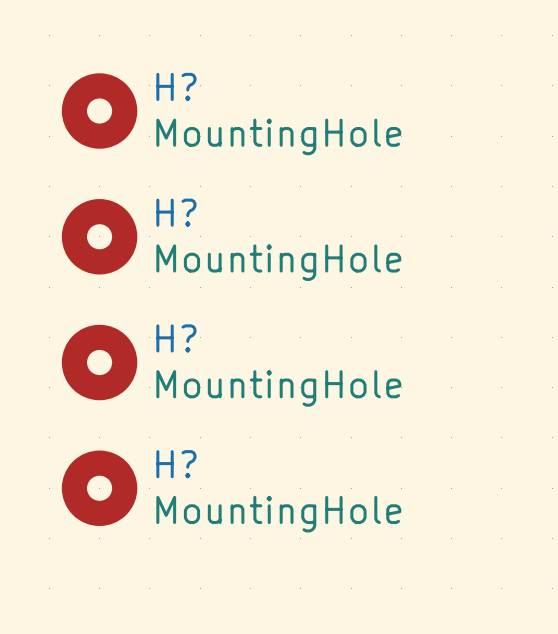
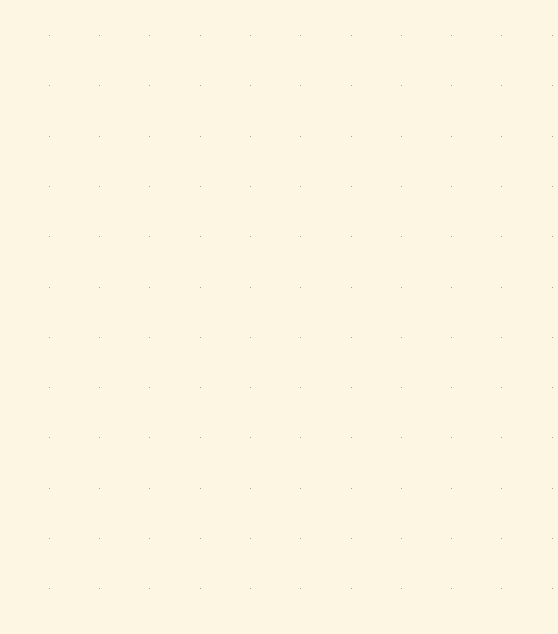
H?: MountingHole (99, 111) -> none
H?: MountingHole (99, 236) -> none
H?: MountingHole (99, 362) -> none
H?: MountingHole (99, 488) -> none

